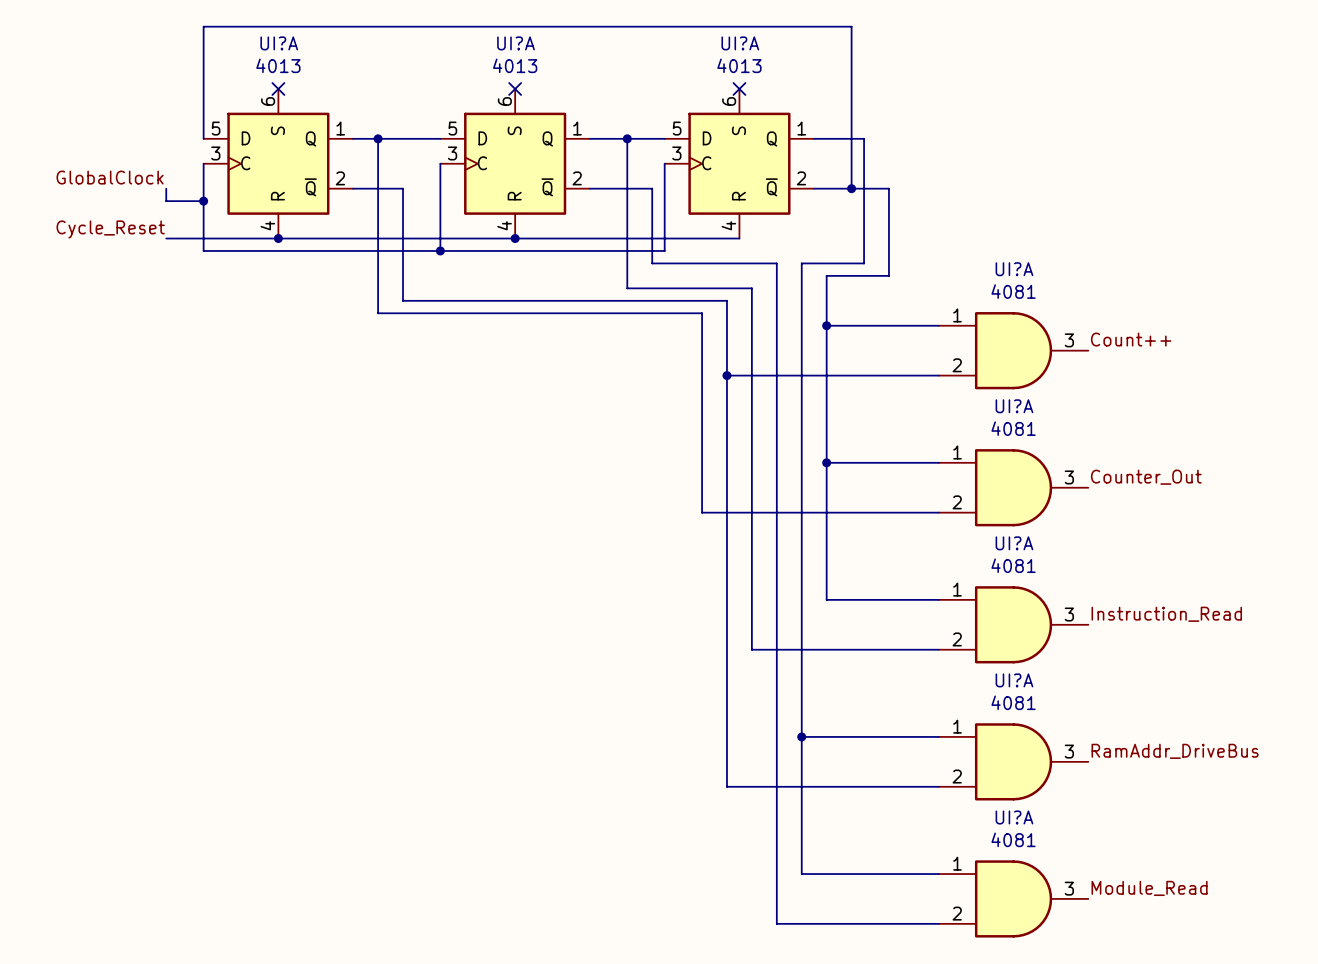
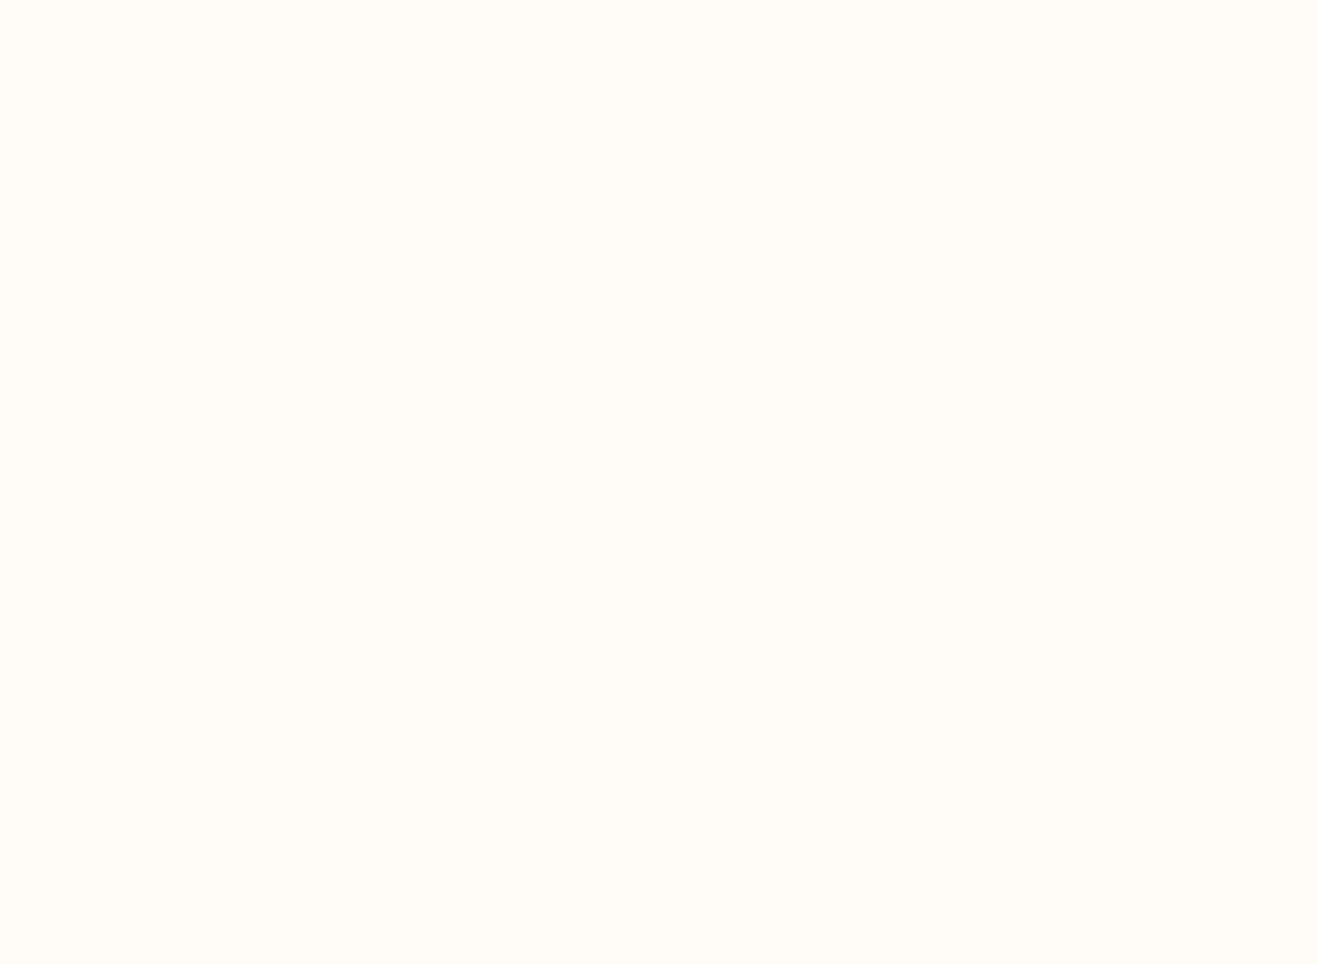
no-connect mark: (278, 88) -> none
no-connect mark: (515, 88) -> none
no-connect mark: (739, 88) -> none
wire: (203, 138) (203, 26) (851, 26) (851, 188) -> none
wire: (353, 138) (440, 138) -> none
wire: (378, 138) (378, 313) (702, 313) (702, 512) (938, 512) -> none
junction: (378, 138) -> none
wire: (589, 138) (664, 138) -> none
wire: (627, 138) (627, 288) (751, 288) (751, 649) (938, 649) -> none
junction: (627, 138) -> none
wire: (814, 138) (864, 138) (864, 263) (801, 263) (801, 874) (938, 874) -> none
wire: (203, 163) (203, 250) (664, 250) (664, 163) -> none
UI?A: 4013 (278, 163) -> none
wire: (440, 163) (440, 250) -> none
UI?A: 4013 (515, 163) -> none
UI?A: 4013 (739, 163) -> none
label: GlobalClock (110, 177) -> none
wire: (166, 188) (166, 201) (203, 201) -> none
wire: (353, 188) (403, 188) (403, 300) (726, 300) (726, 786) (938, 786) -> none
wire: (589, 188) (652, 188) (652, 263) (776, 263) (776, 923) (938, 923) -> none
wire: (814, 188) (888, 188) (888, 275) (826, 275) (826, 599) (938, 599) -> none
junction: (851, 188) -> none
junction: (203, 201) -> none
label: Cycle_Reset (110, 229) -> none
wire: (166, 238) (739, 238) -> none
junction: (278, 238) -> none
junction: (515, 238) -> none
junction: (440, 250) -> none
wire: (826, 325) (938, 325) -> none
junction: (826, 325) -> none
label: Count++ (1131, 339) -> none
UI?A: 4081 (1013, 350) -> none
wire: (726, 375) (938, 375) -> none
junction: (726, 375) -> none
wire: (826, 462) (938, 462) -> none
junction: (826, 462) -> none
label: Counter_Out (1146, 477) -> none
UI?A: 4081 (1013, 487) -> none
label: Instruction_Read (1166, 614) -> none
UI?A: 4081 (1013, 624) -> none
wire: (801, 736) (938, 736) -> none
junction: (801, 736) -> none
label: RamAddr_DriveBus (1175, 751) -> none
UI?A: 4081 (1013, 761) -> none
label: Module_Read (1149, 888) -> none
UI?A: 4081 (1013, 898) -> none

